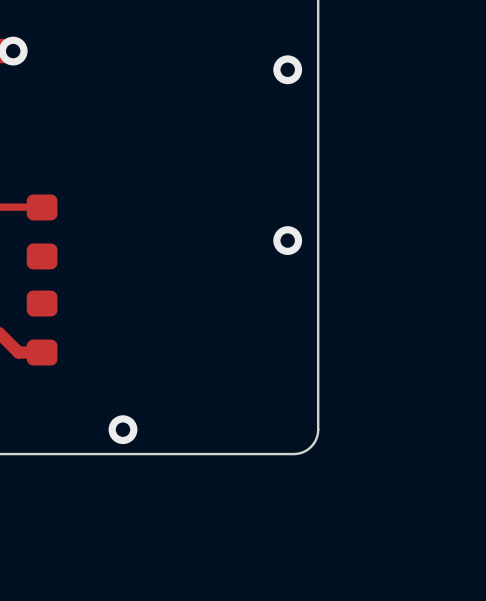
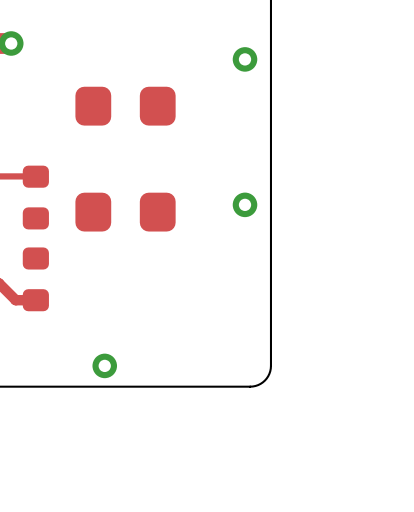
part: none -> (125, 106)
part: none -> (125, 212)

